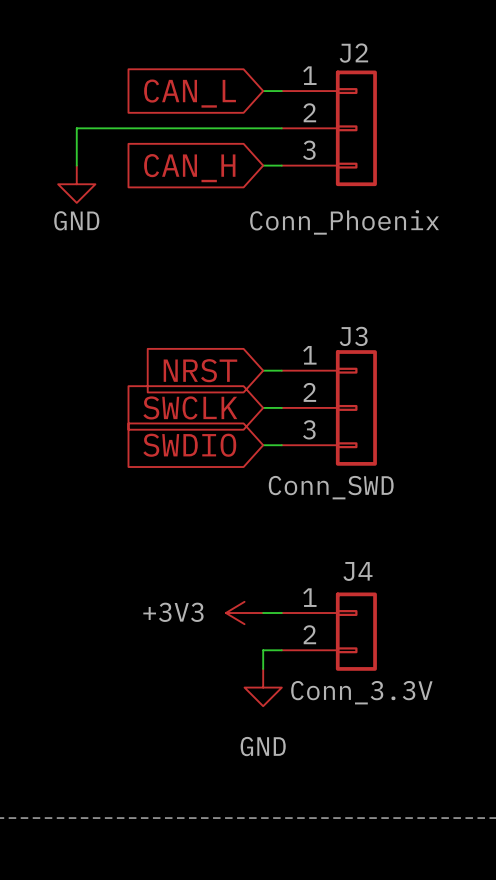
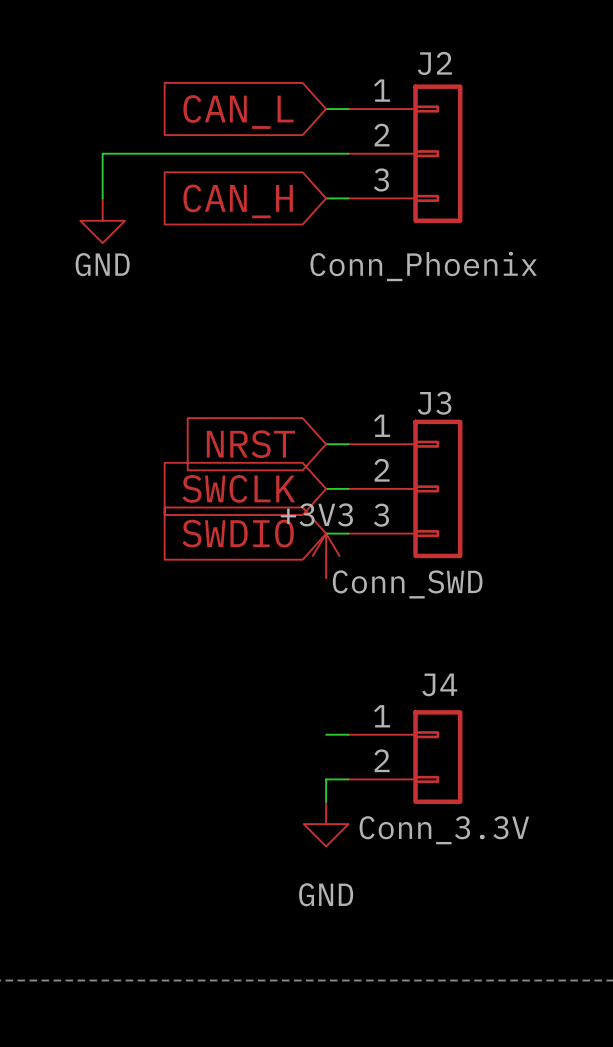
power symbol text position: +3V3 (173, 612) -> +3V3 (316, 514)
power symbol rotation: 0° (244, 613) -> 90° clockwise (326, 555)
power symbol position: +3V3 (244, 613) -> +3V3 (326, 555)

